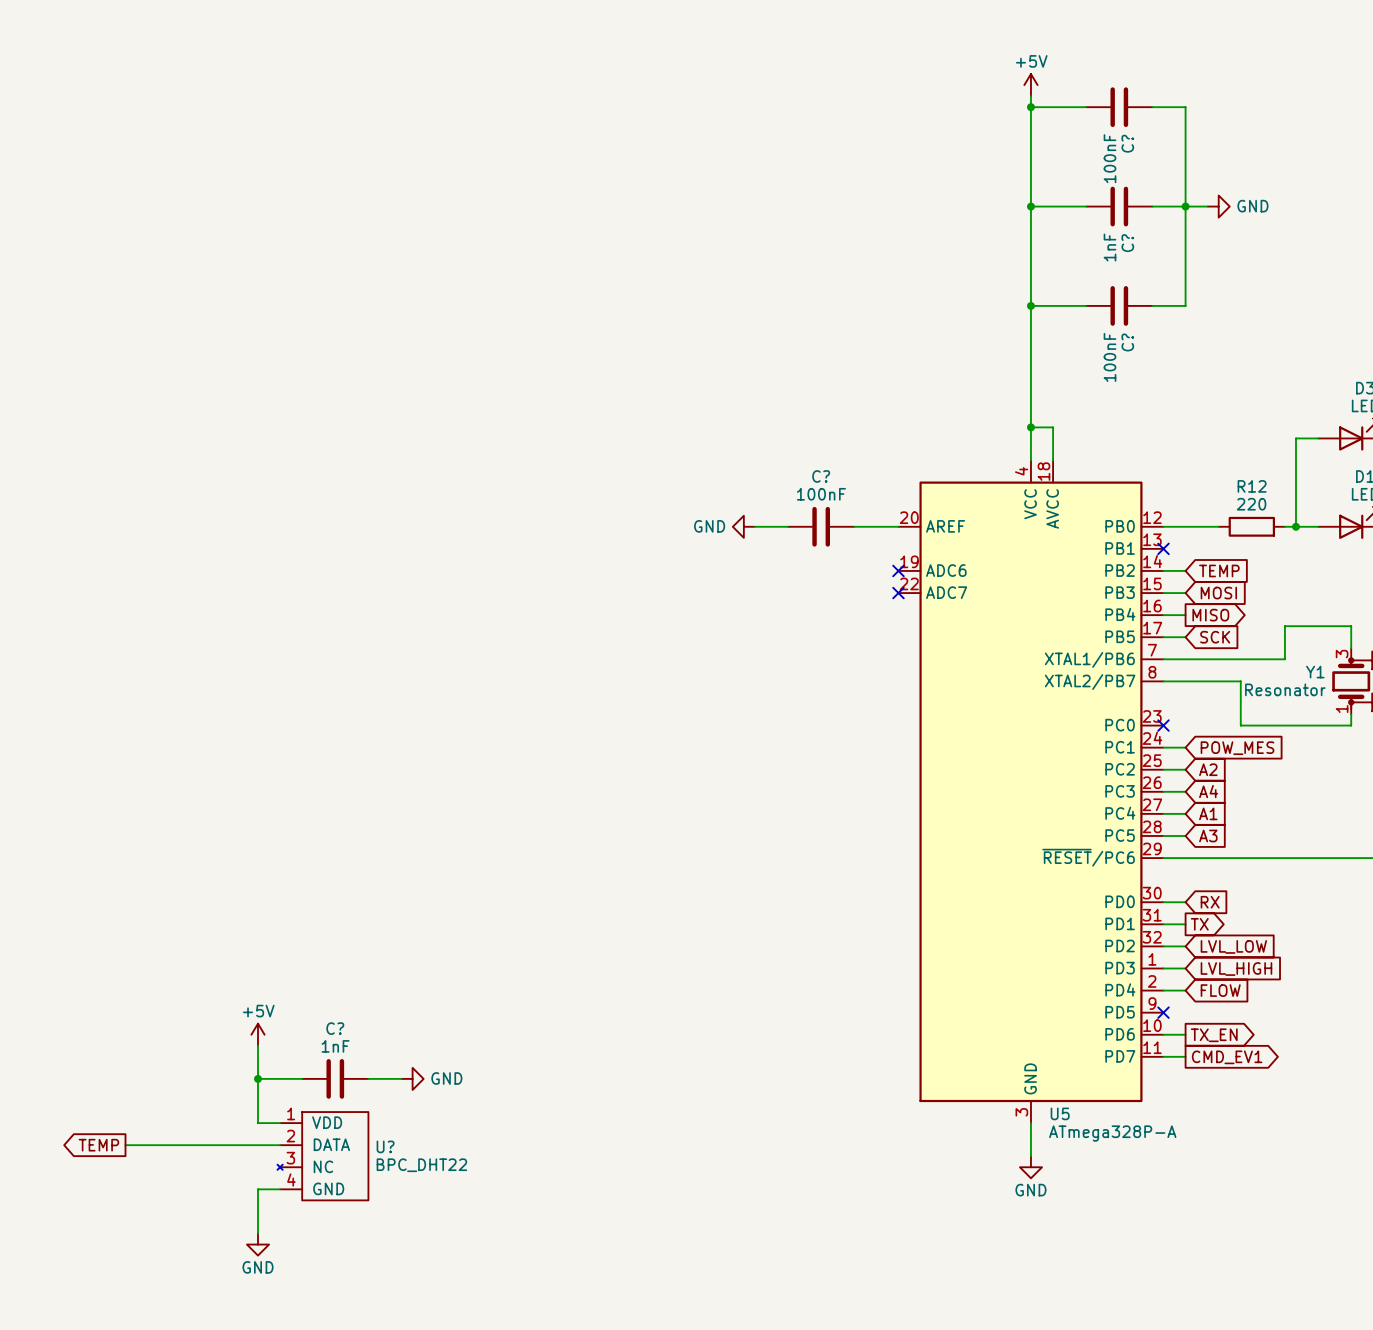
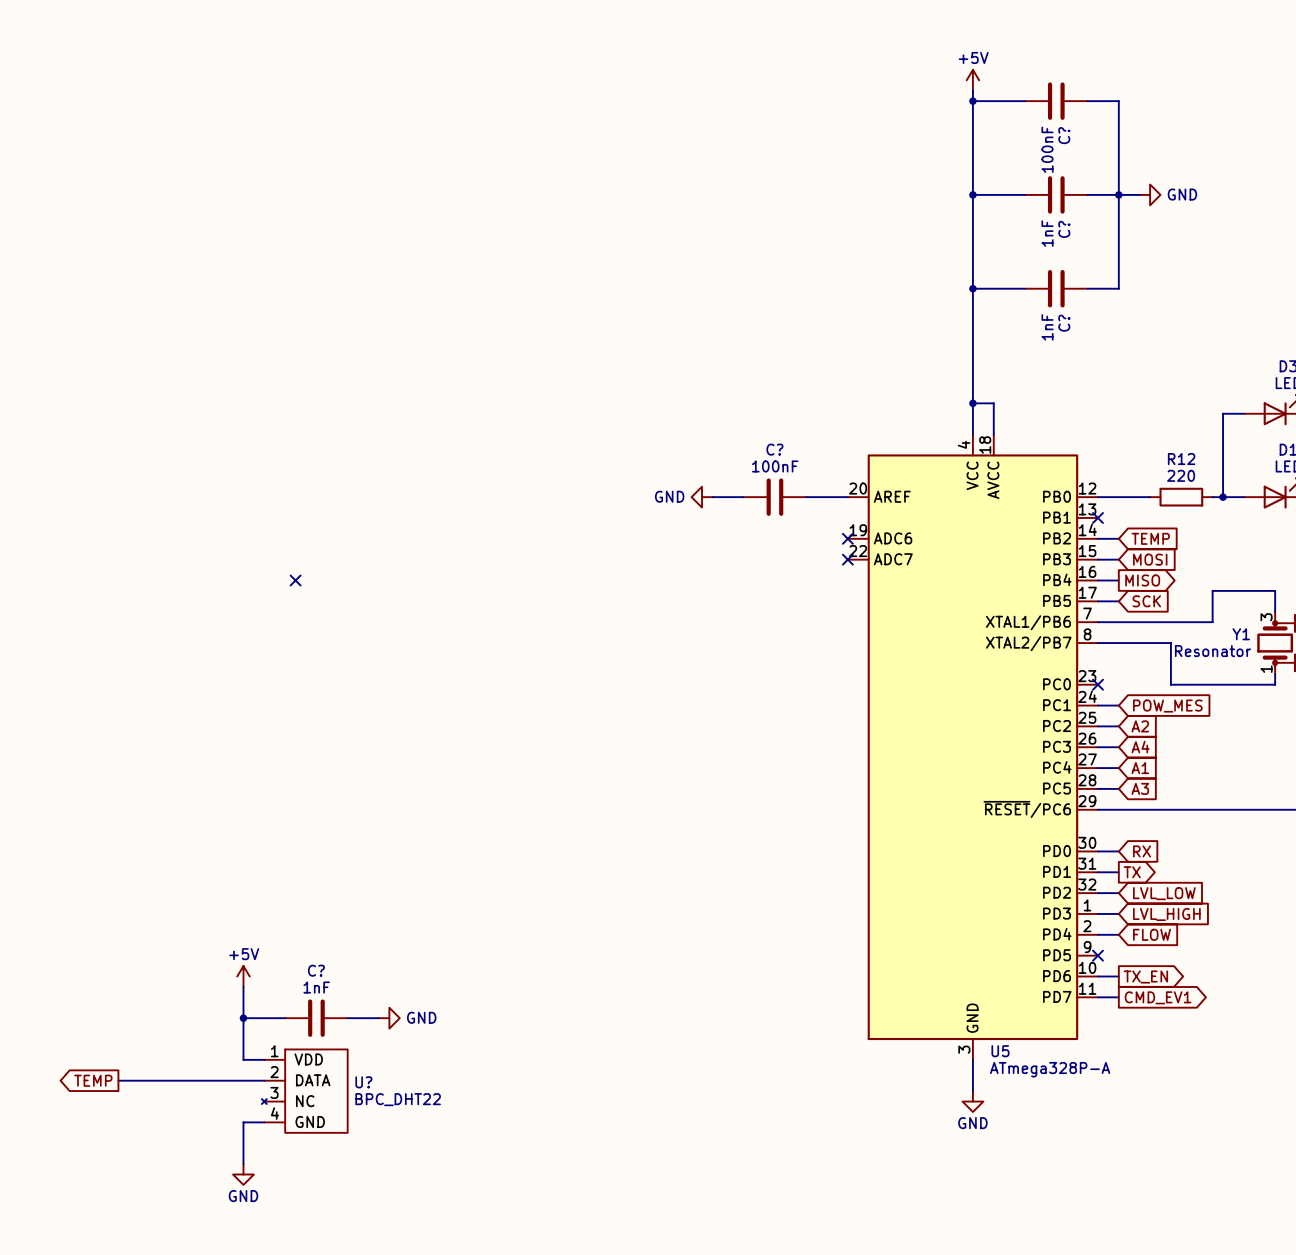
C? value: 100nF (1110, 357) -> 1nF (1047, 327)
no-connect mark: none -> (295, 580)

